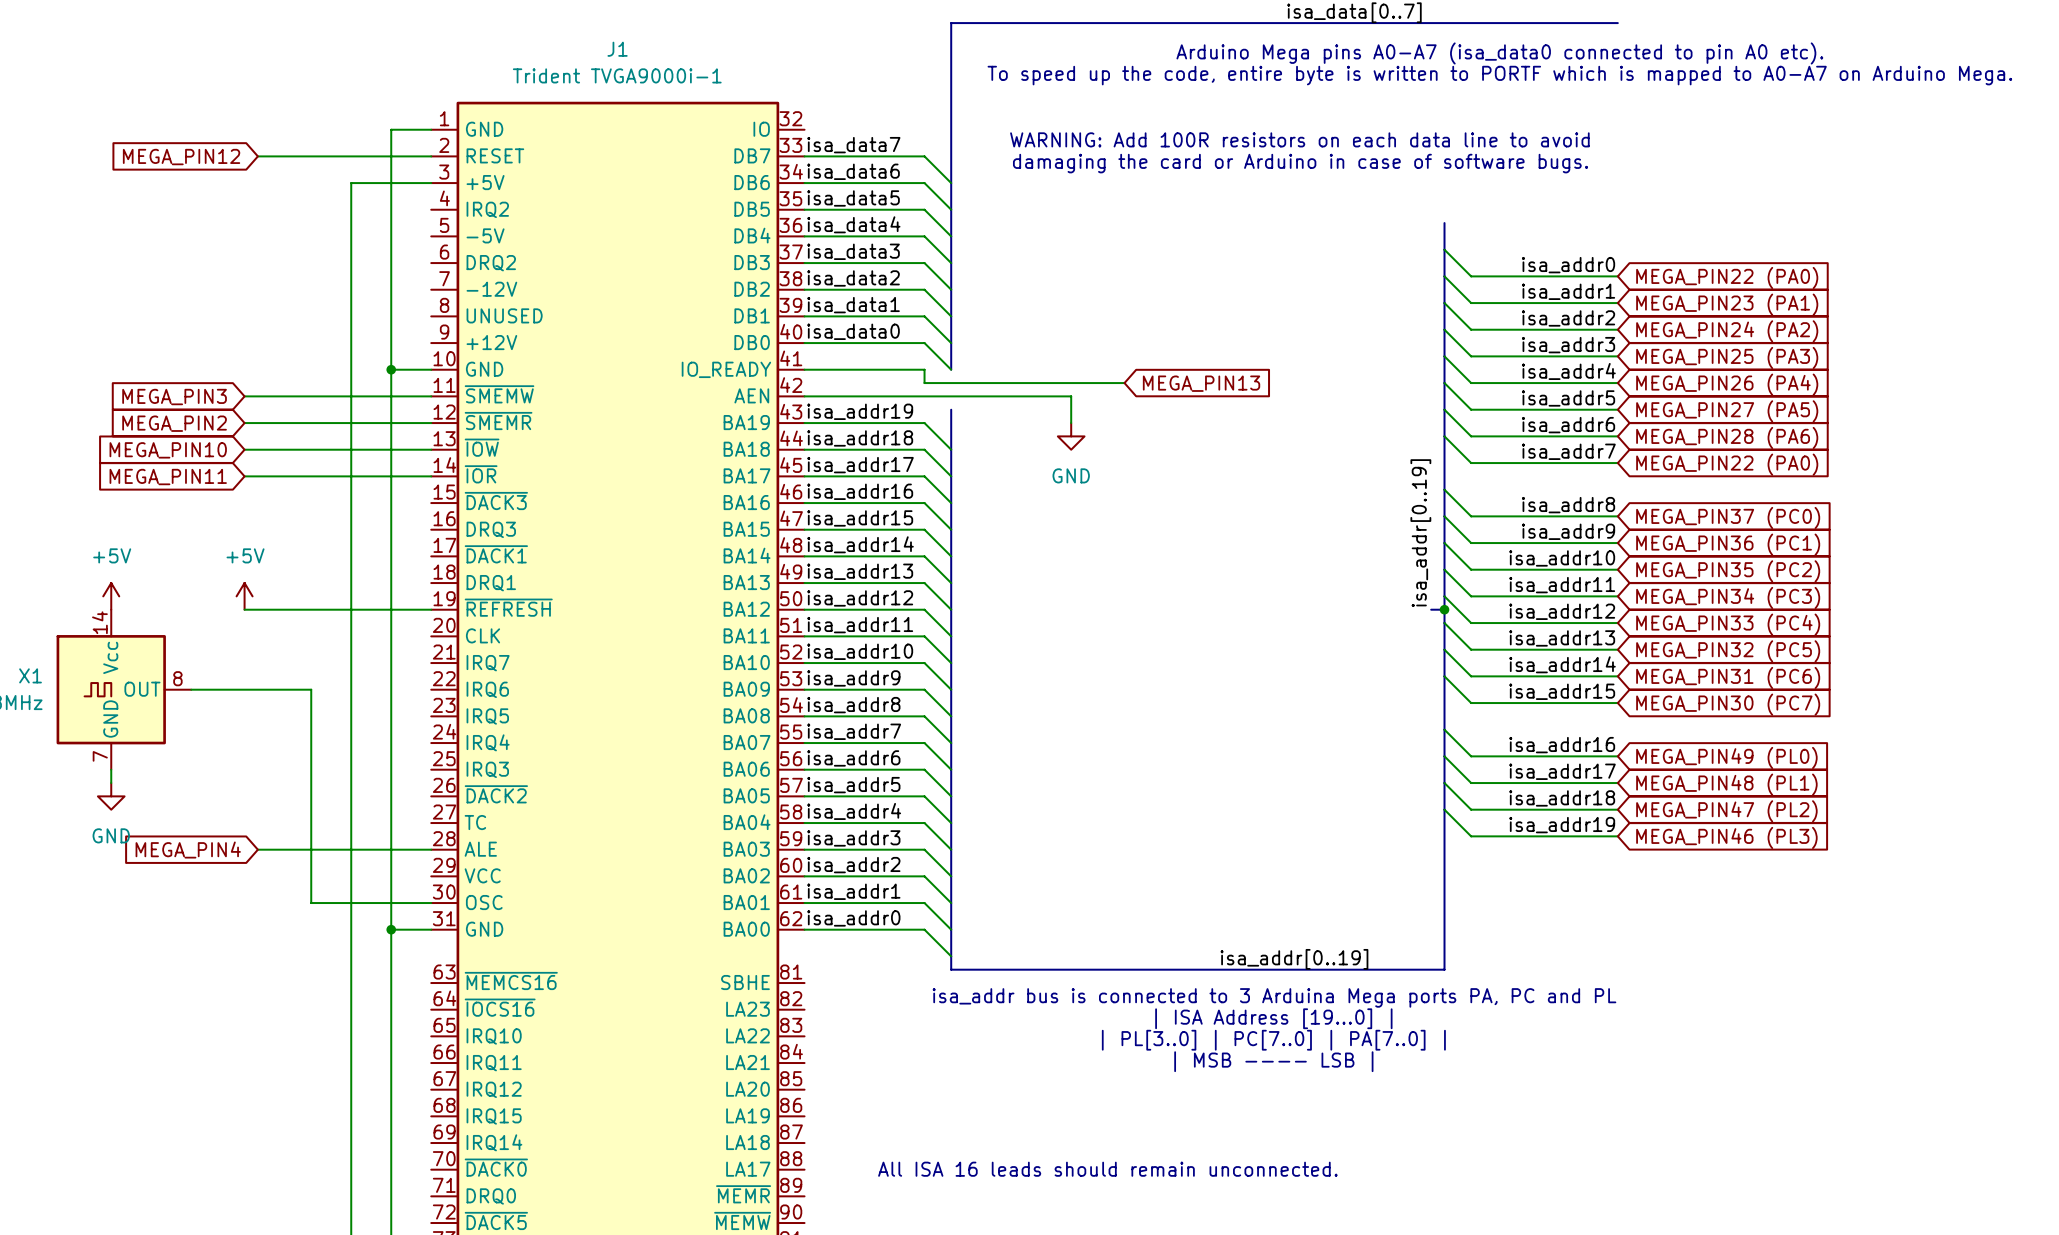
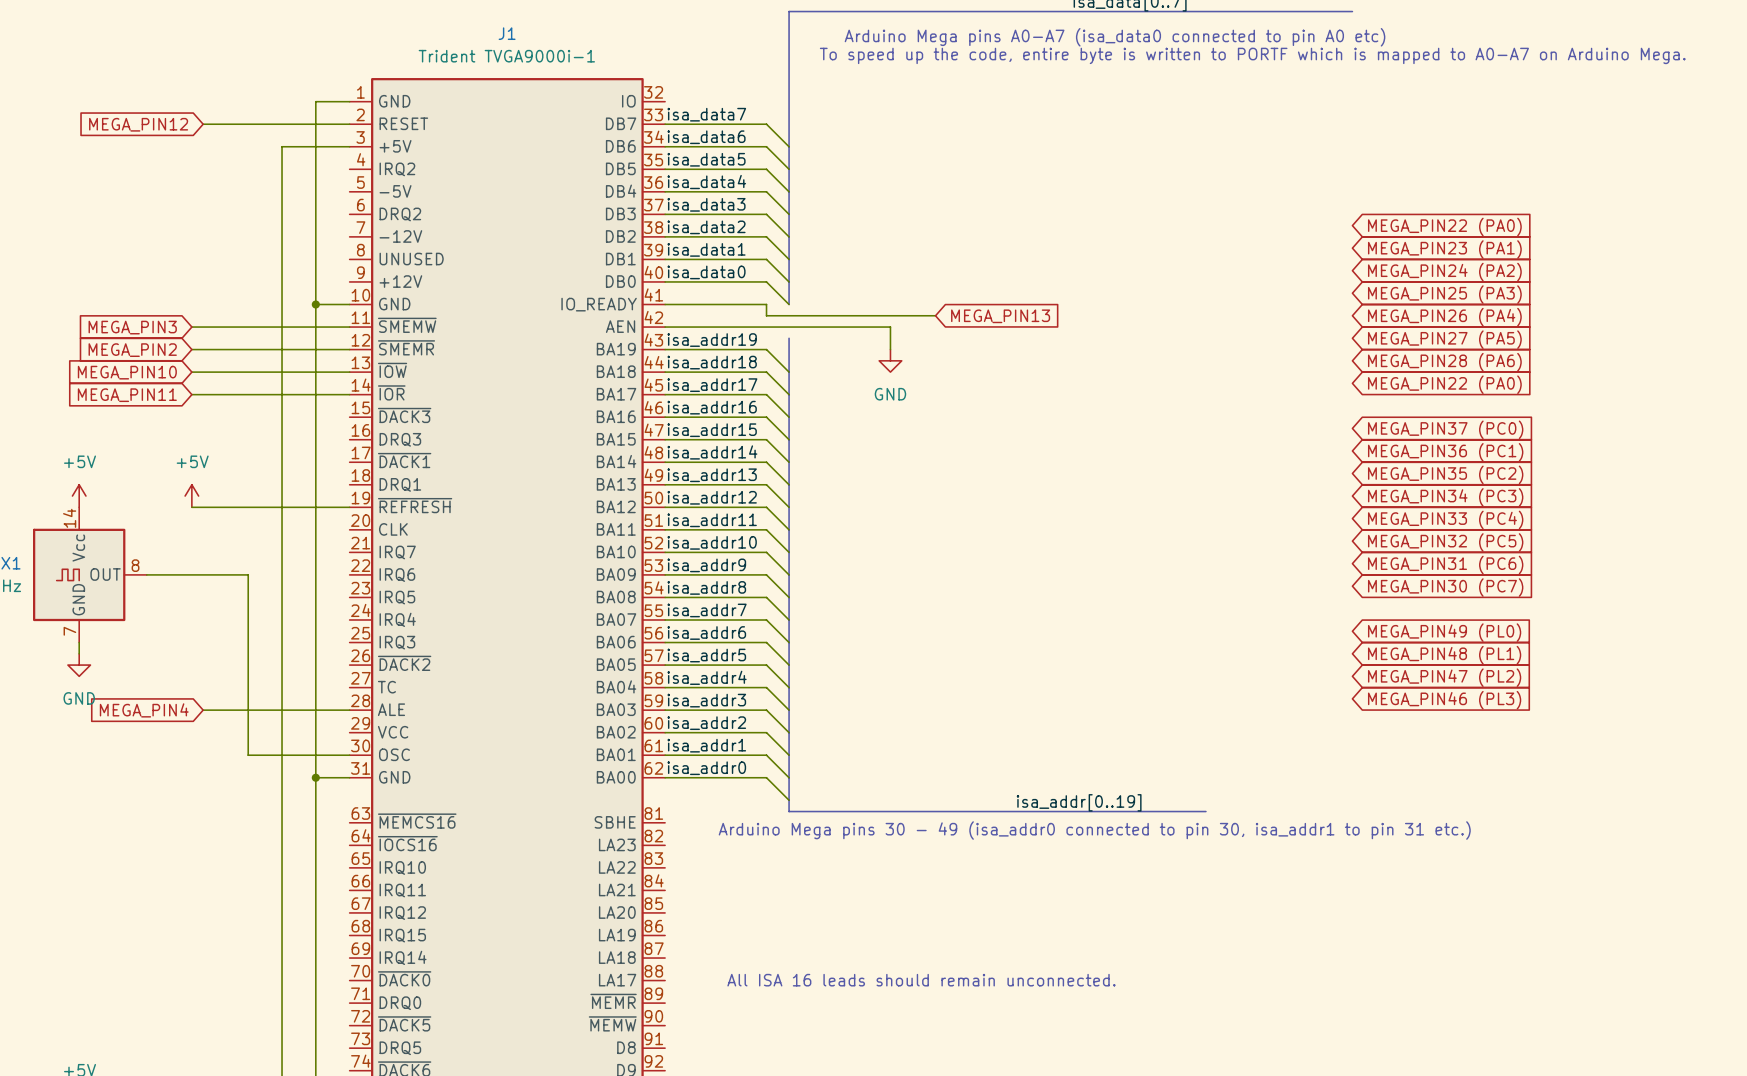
text: Arduino Mega pins A0-A7 (isa_data0 connected to pin A0 etc). (1499, 53) -> Arduino Mega pins A0-A7 (isa_data0 connected to pin A0 etc) (1115, 37)
text: WARNING: Add 100R resistors on each data line to avoid (1299, 139) -> none
text: damaging the card or Arduino in case of software bugs. (1300, 163) -> none
bus: (1444, 223) (1444, 969) -> none
wire: (1444, 249) (1471, 276) (1617, 276) -> none
label: isa_addr0 (1568, 265) -> none
wire: (1444, 276) (1471, 303) (1617, 303) -> none
label: isa_addr1 (1568, 291) -> none
wire: (1444, 303) (1471, 329) (1617, 329) -> none
label: isa_addr2 (1568, 318) -> none
wire: (1444, 329) (1471, 356) (1617, 356) -> none
label: isa_addr3 (1568, 345) -> none
wire: (1444, 356) (1471, 383) (1617, 383) -> none
label: isa_addr4 (1568, 371) -> none
wire: (1444, 383) (1471, 409) (1617, 409) -> none
label: isa_addr5 (1568, 398) -> none
wire: (1444, 409) (1471, 436) (1617, 436) -> none
label: isa_addr6 (1568, 425) -> none
wire: (1444, 436) (1471, 463) (1617, 463) -> none
label: isa_addr7 (1568, 451) -> none
wire: (1444, 489) (1471, 516) (1617, 516) -> none
label: isa_addr8 (1568, 505) -> none
wire: (1444, 516) (1471, 543) (1617, 543) -> none
label: isa_addr9 (1568, 531) -> none
label: isa_addr[0..19] (1420, 533) -> none
wire: (1444, 543) (1471, 569) (1617, 569) -> none
label: isa_addr10 (1562, 558) -> none
wire: (1444, 569) (1471, 596) (1617, 596) -> none
label: isa_addr11 (1562, 585) -> none
wire: (1444, 596) (1471, 623) (1617, 623) -> none
bus: (1431, 609) (1444, 609) -> none
junction: (1444, 609) -> none
label: isa_addr12 (1562, 611) -> none
wire: (1444, 623) (1471, 649) (1617, 649) -> none
label: isa_addr13 (1562, 638) -> none
wire: (1444, 649) (1471, 676) (1617, 676) -> none
label: isa_addr14 (1562, 664) -> none
wire: (1444, 676) (1471, 703) (1617, 703) -> none
label: isa_addr15 (1562, 691) -> none
wire: (1444, 729) (1471, 756) (1617, 756) -> none
label: isa_addr16 (1562, 745) -> none
wire: (1444, 756) (1471, 783) (1617, 783) -> none
label: isa_addr17 (1562, 771) -> none
wire: (1444, 783) (1471, 809) (1617, 809) -> none
label: isa_addr18 (1562, 798) -> none
wire: (1444, 809) (1471, 836) (1617, 836) -> none
label: isa_addr19 (1562, 825) -> none
text: none -> Arduino Mega pins 30 - 49 (isa_addr0 connected to pin 30, isa_addr1 to pin 31 etc.) (1094, 830)
text: isa_addr bus is connected to 3 Arduina Mega ports PA, PC and PL (1274, 997) -> none
text: | ISA Address [19...0] | (1273, 1018) -> none
text: | PL[3..0] | PC[7..0] | PA[7..0] | (1273, 1040) -> none
text: | MSB ---- LSB | (1273, 1061) -> none

